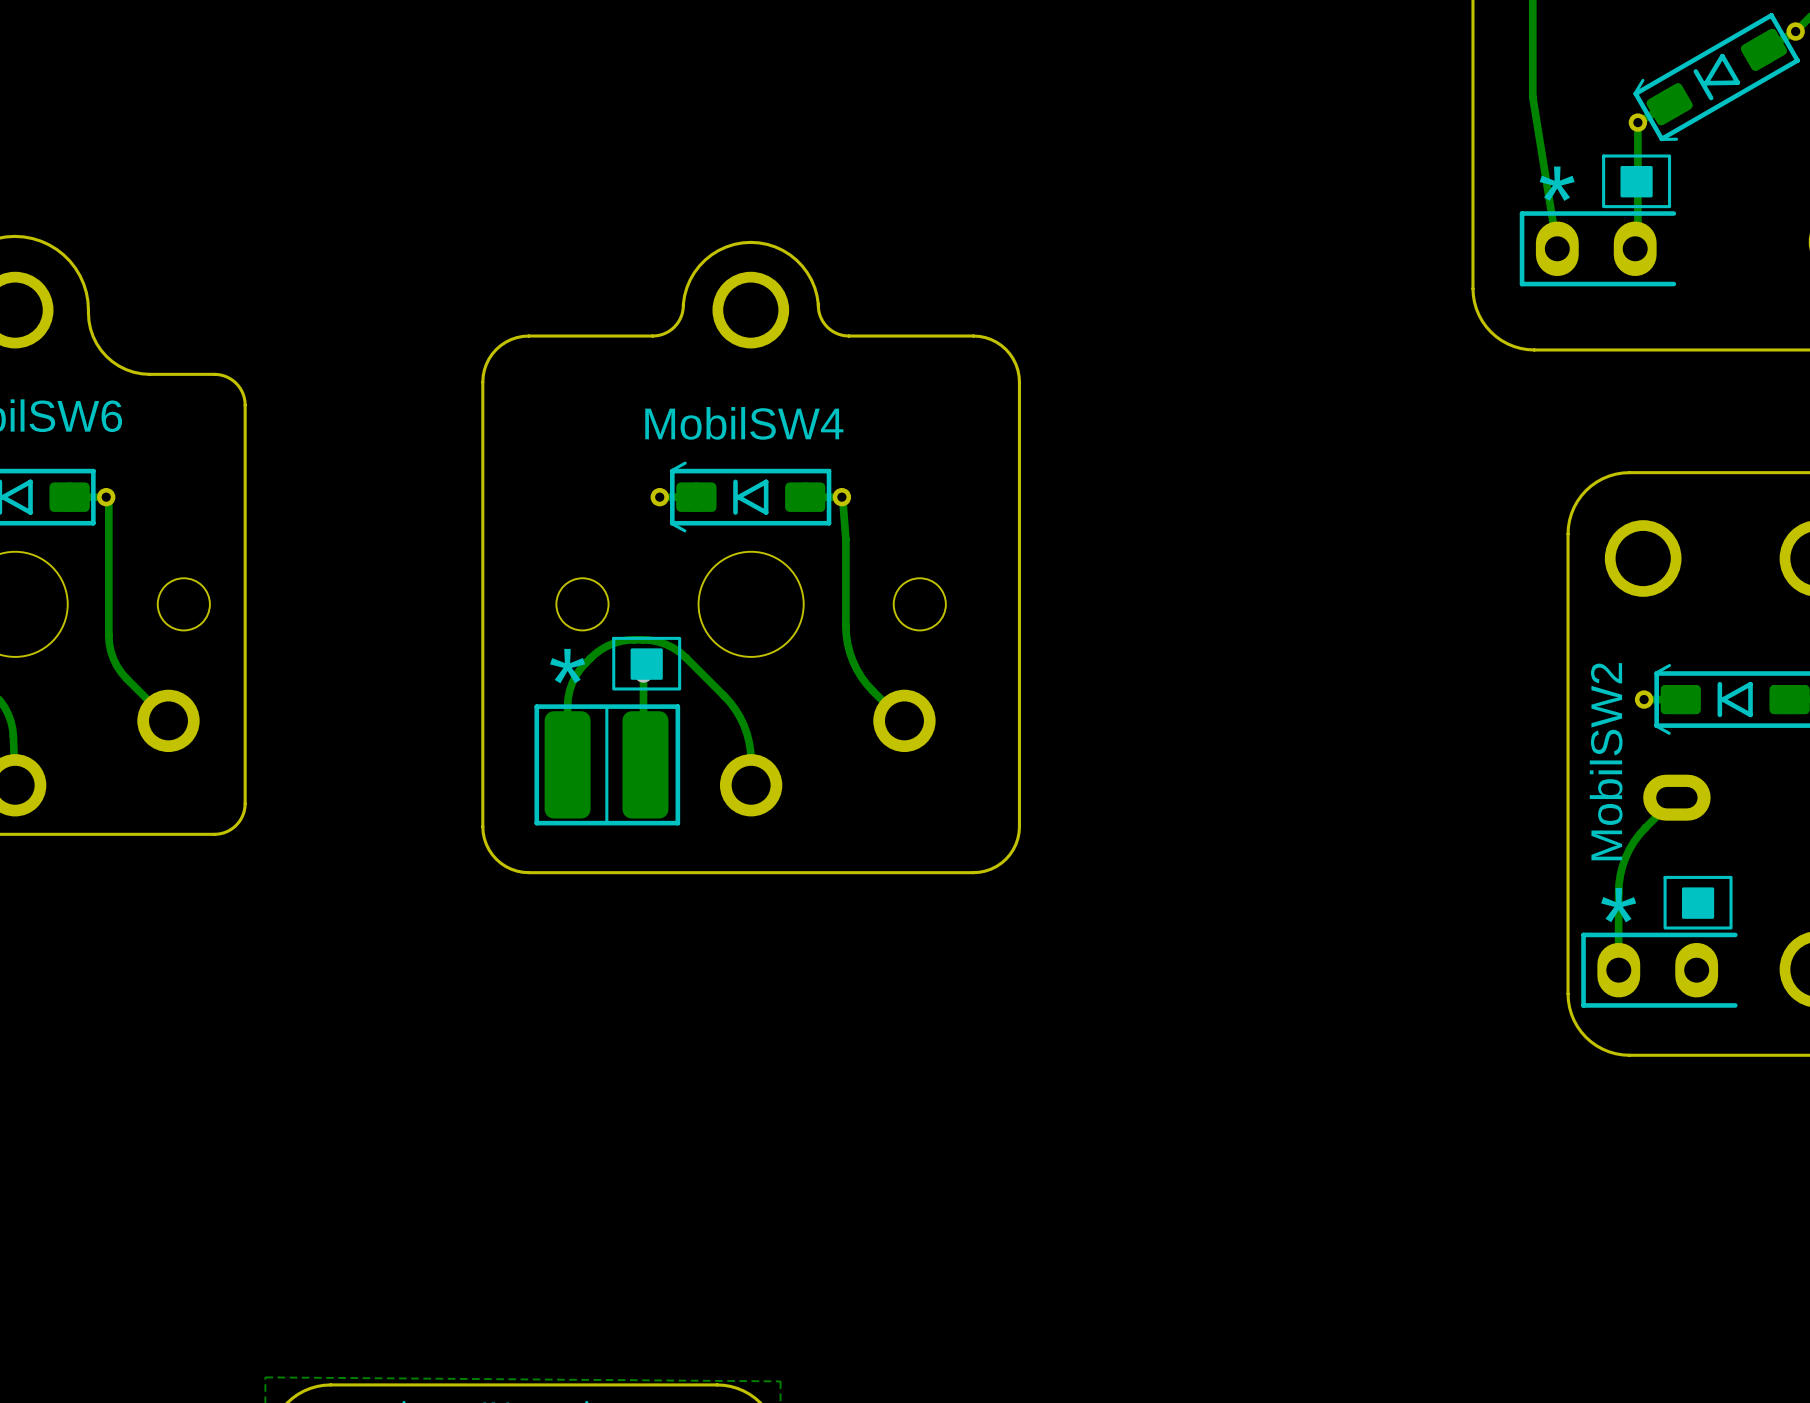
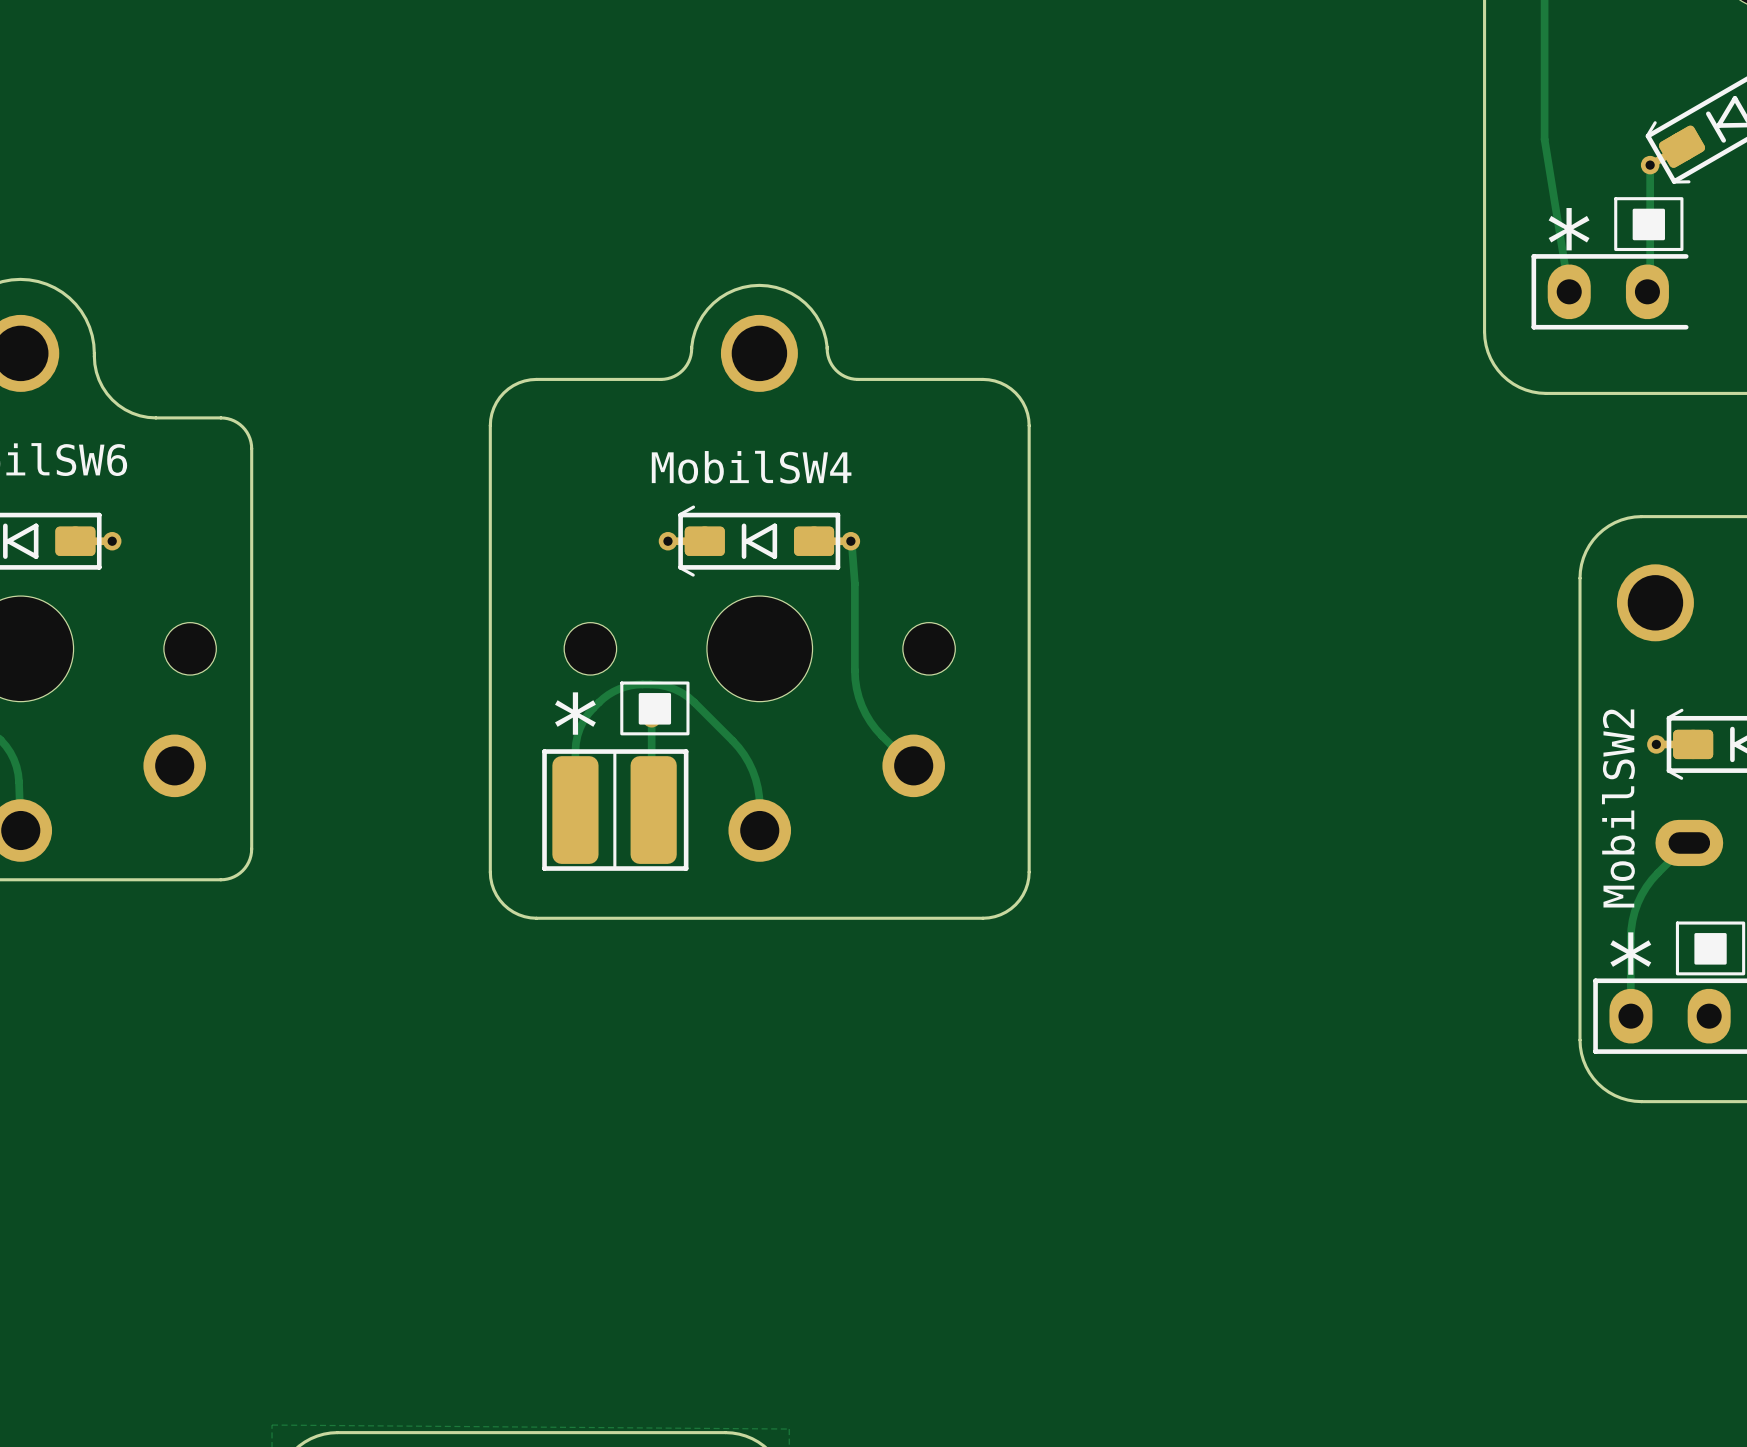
track: (105, 496) (108, 499) (108, 635) (110, 651) (121, 672) (167, 719) -> none

